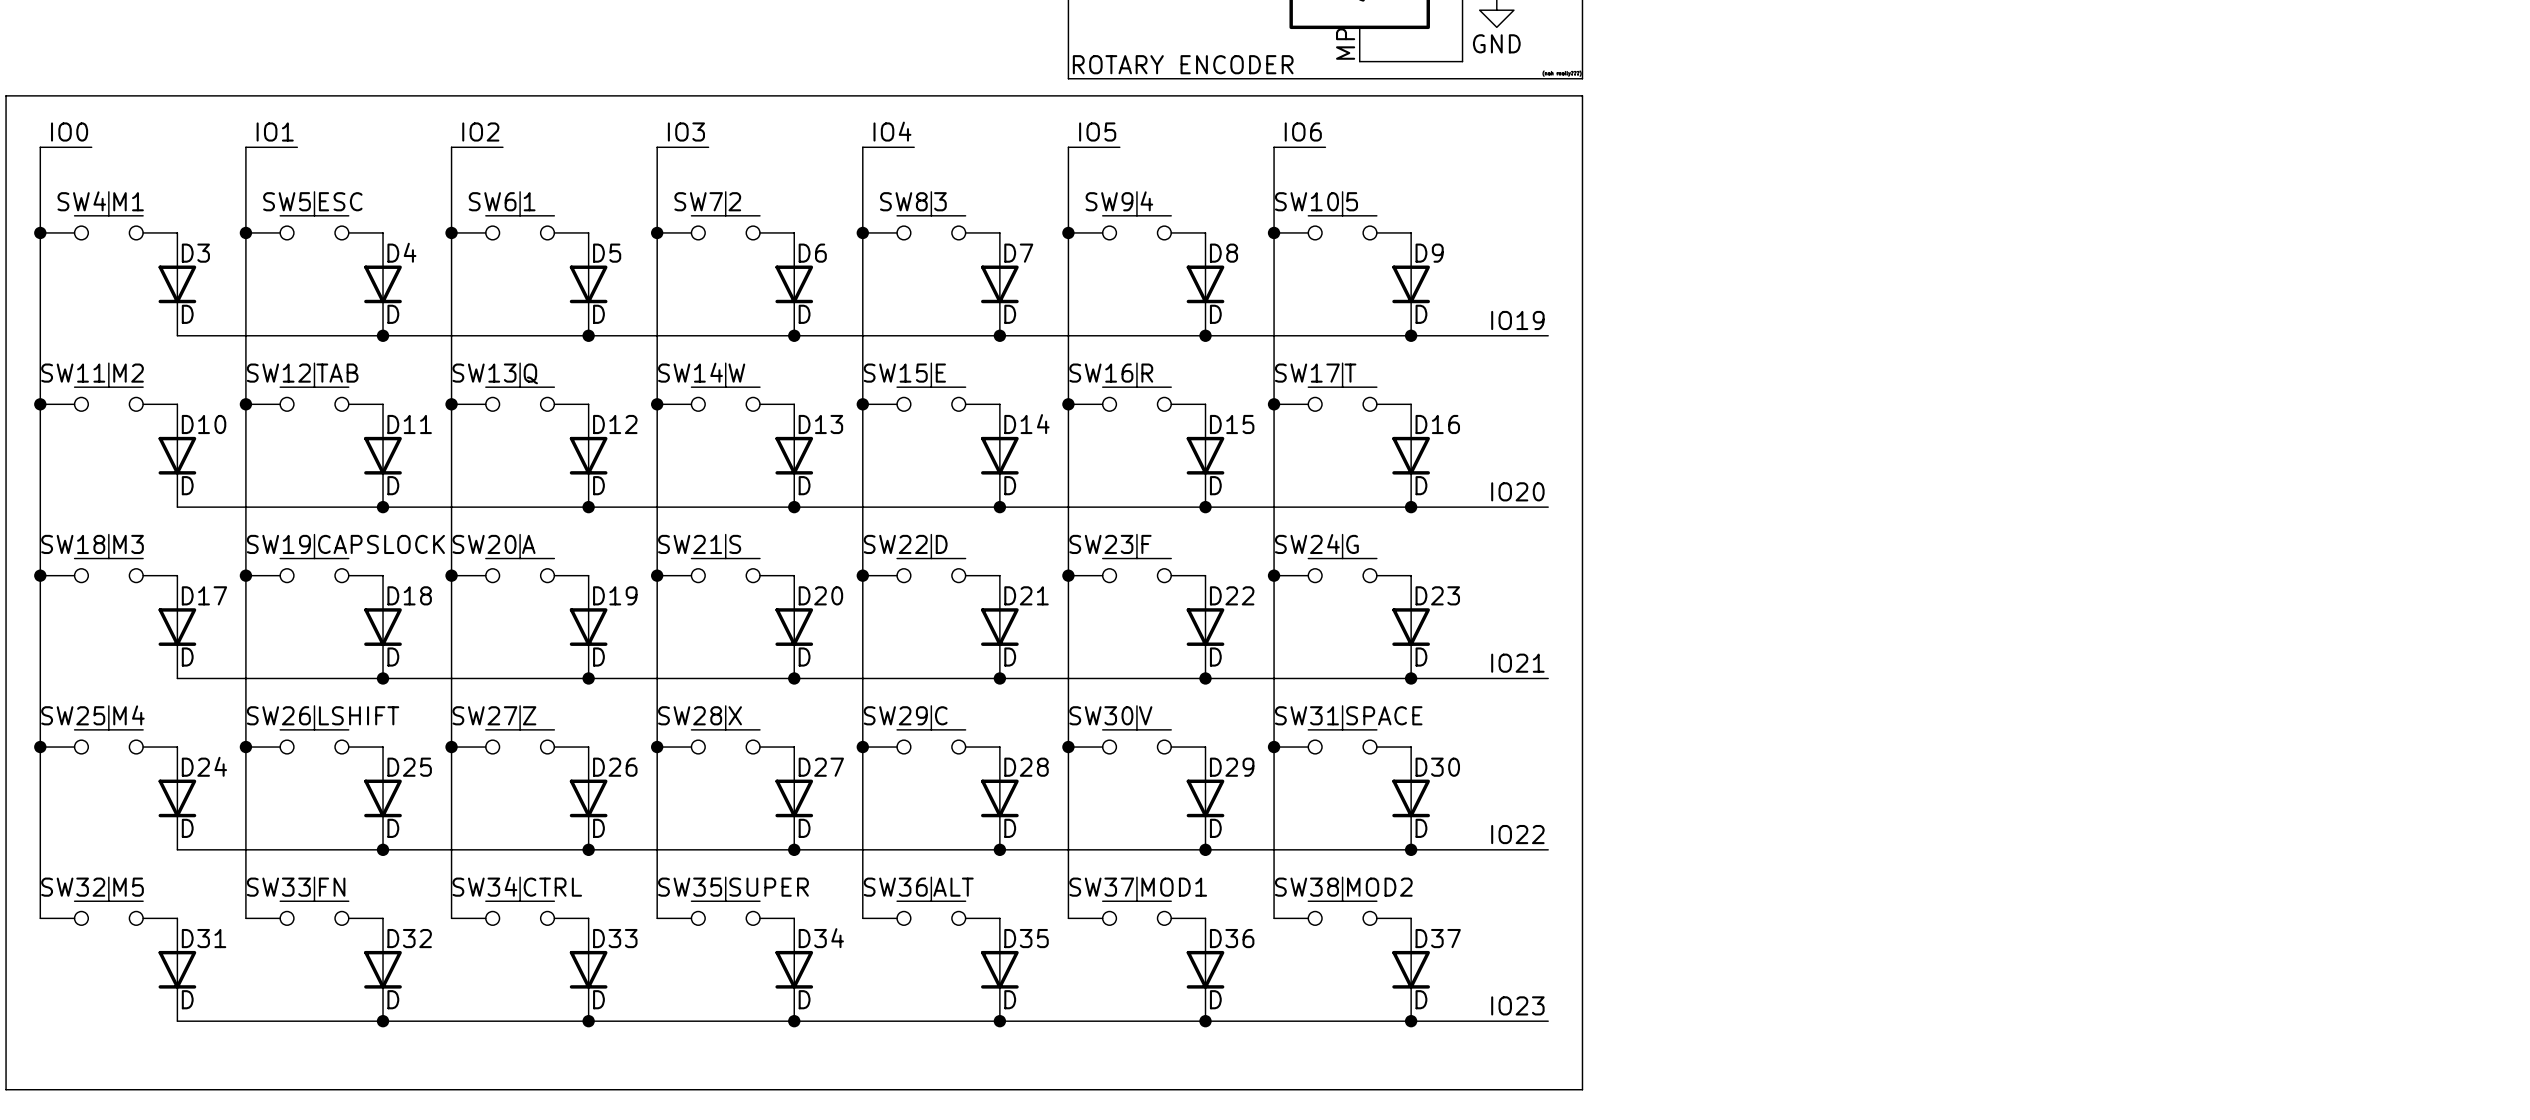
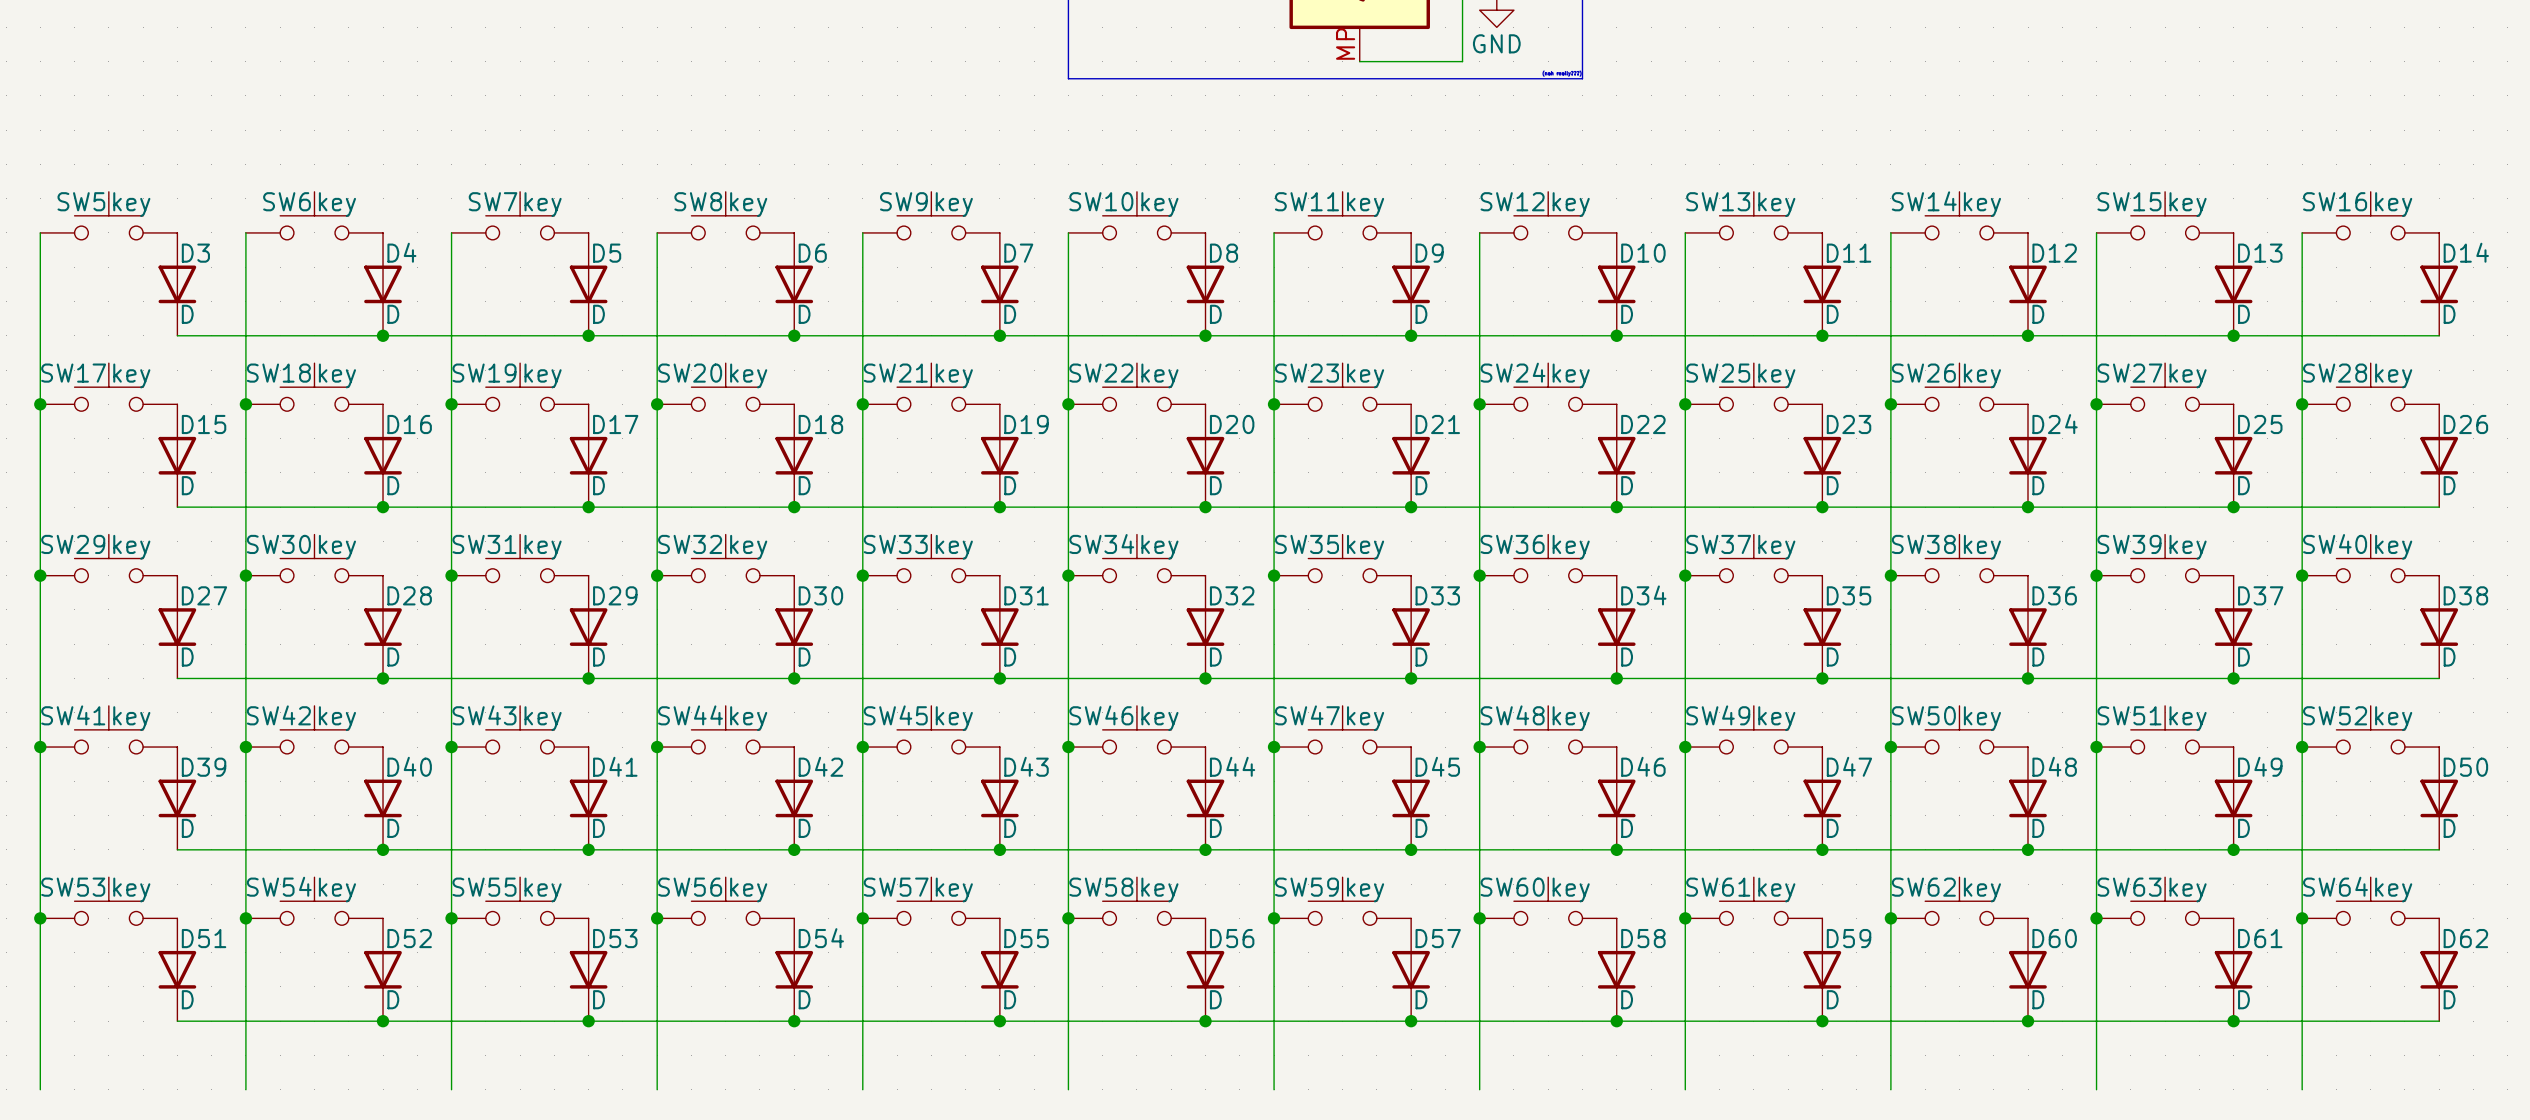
text: ROTARY ENCODER (1183, 64) -> none
line: (6, 95) (1582, 95) (1582, 1089) (6, 1089) (6, 95) -> none
label: IO0 (69, 131) -> none
label: IO1 (275, 131) -> none
label: IO2 (480, 131) -> none
label: IO3 (686, 131) -> none
label: IO4 (892, 131) -> none
label: IO5 (1097, 131) -> none
label: IO6 (1303, 131) -> none
wire: (91, 147) (40, 147) (40, 232) -> none
wire: (297, 147) (245, 147) (245, 232) -> none
wire: (502, 147) (451, 147) (451, 232) -> none
wire: (708, 147) (657, 147) (657, 232) -> none
wire: (914, 147) (862, 147) (862, 232) -> none
wire: (1119, 147) (1068, 147) (1068, 232) -> none
wire: (1325, 147) (1274, 147) (1274, 232) -> none
SW4 name: SW4 (81, 201) -> SW5 (81, 201)
SW4 value: M1 (128, 201) -> key (131, 204)
SW5 name: SW5 (287, 201) -> SW6 (287, 201)
SW5 value: ESC (340, 201) -> key (337, 204)
SW6 name: SW6 (492, 201) -> SW7 (493, 201)
SW6 value: 1 (529, 201) -> key (543, 204)
SW7 name: SW7 (698, 201) -> SW8 (698, 201)
SW7 value: 2 (734, 201) -> key (748, 204)
SW8 name: SW8 (903, 201) -> SW9 (903, 201)
SW8 value: 3 (940, 201) -> key (954, 204)
SW9 name: SW9 (1109, 201) -> SW10 (1101, 201)
SW9 value: 4 (1146, 201) -> key (1159, 204)
SW10 name: SW10 (1306, 201) -> SW11 (1306, 201)
SW10 value: 5 (1352, 201) -> key (1365, 204)
SW12: none -> key (1548, 215)
SW13: none -> key (1753, 215)
SW14: none -> key (1959, 215)
SW15: none -> key (2165, 215)
SW16: none -> key (2370, 215)
junction: (40, 232) -> none
junction: (245, 232) -> none
junction: (451, 232) -> none
junction: (657, 232) -> none
junction: (862, 232) -> none
junction: (1068, 232) -> none
junction: (1274, 232) -> none
wire: none -> (1479, 232) (1479, 1089)
wire: none -> (1685, 232) (1685, 1089)
wire: none -> (1890, 232) (1890, 1089)
wire: none -> (2096, 232) (2096, 1089)
wire: none -> (2302, 232) (2302, 1089)
D10: none -> D (1616, 284)
D11: none -> D (1822, 284)
D12: none -> D (2028, 284)
D13: none -> D (2233, 284)
D14: none -> D (2439, 284)
label: IO19 (1517, 320) -> none
wire: none -> (1548, 335) (2439, 335)
junction: none -> (1616, 335)
junction: none -> (1822, 335)
junction: none -> (2028, 335)
junction: none -> (2233, 335)
SW14 name: SW14 (690, 372) -> SW20 (690, 373)
SW11 name: SW11 (73, 373) -> SW17 (73, 373)
SW11 value: M2 (128, 373) -> key (131, 375)
SW12 name: SW12 (278, 373) -> SW18 (278, 373)
SW12 value: TAB (337, 373) -> key (337, 375)
SW13 name: SW13 (484, 373) -> SW19 (484, 373)
SW13 value: Q (530, 373) -> key (543, 375)
SW14 value: W (736, 373) -> key (748, 375)
SW15 name: SW15 (895, 373) -> SW21 (895, 373)
SW15 value: E (940, 373) -> key (954, 375)
SW16 name: SW16 (1101, 373) -> SW22 (1101, 373)
SW16 value: R (1147, 373) -> key (1159, 375)
SW17 name: SW17 (1307, 373) -> SW23 (1306, 373)
SW17 value: T (1350, 373) -> key (1365, 375)
SW24: none -> key (1548, 387)
SW25: none -> key (1753, 387)
SW26: none -> key (1959, 387)
SW27: none -> key (2165, 387)
SW28: none -> key (2370, 387)
junction: none -> (1479, 404)
junction: none -> (1685, 404)
junction: none -> (1890, 404)
junction: none -> (2096, 404)
junction: none -> (2302, 404)
D10 name: D10 (204, 424) -> D15 (204, 424)
D11 name: D11 (409, 424) -> D16 (409, 424)
D12 name: D12 (615, 424) -> D17 (615, 424)
D13 name: D13 (820, 424) -> D18 (820, 424)
D14 name: D14 (1026, 424) -> D19 (1026, 424)
D15 name: D15 (1232, 424) -> D20 (1232, 424)
D16 name: D16 (1437, 424) -> D21 (1437, 424)
D22: none -> D (1616, 455)
D23: none -> D (1822, 455)
D24: none -> D (2028, 455)
D25: none -> D (2233, 455)
D26: none -> D (2439, 455)
label: IO20 (1517, 491) -> none
wire: none -> (1548, 507) (2439, 507)
junction: none -> (1616, 507)
junction: none -> (1822, 507)
junction: none -> (2028, 507)
junction: none -> (2233, 507)
SW18 name: SW18 (73, 544) -> SW29 (73, 544)
SW18 value: M3 (128, 544) -> key (131, 547)
SW19 name: SW19 (278, 544) -> SW30 (278, 544)
SW19 value: CAPSLOCK (381, 544) -> key (337, 547)
SW20 name: SW20 (484, 544) -> SW31 (484, 544)
SW20 value: A (528, 544) -> key (543, 547)
SW21 name: SW21 (690, 544) -> SW32 (690, 544)
SW21 value: S (735, 544) -> key (748, 547)
SW22 name: SW22 (895, 544) -> SW33 (895, 544)
SW22 value: D (941, 544) -> key (954, 547)
SW23 name: SW23 (1101, 544) -> SW34 (1101, 544)
SW23 value: F (1146, 544) -> key (1159, 547)
SW24 name: SW24 (1307, 544) -> SW35 (1306, 544)
SW24 value: G (1352, 544) -> key (1365, 547)
SW36: none -> key (1548, 558)
SW37: none -> key (1753, 558)
SW38: none -> key (1959, 558)
SW39: none -> key (2165, 558)
SW40: none -> key (2370, 558)
junction: none -> (1479, 575)
junction: none -> (1685, 575)
junction: none -> (1890, 575)
junction: none -> (2096, 575)
junction: none -> (2302, 575)
D17 name: D17 (204, 595) -> D27 (204, 595)
D18 name: D18 (409, 595) -> D28 (409, 595)
D19 name: D19 (615, 595) -> D29 (615, 595)
D20 name: D20 (820, 595) -> D30 (820, 595)
D21 name: D21 (1026, 595) -> D31 (1026, 595)
D22 name: D22 (1232, 595) -> D32 (1232, 595)
D23 name: D23 (1437, 595) -> D33 (1437, 595)
D34: none -> D (1616, 627)
D35: none -> D (1822, 627)
D36: none -> D (2028, 627)
D37: none -> D (2233, 627)
D38: none -> D (2439, 627)
label: IO21 (1517, 663) -> none
wire: none -> (1548, 678) (2439, 678)
junction: none -> (1616, 678)
junction: none -> (1822, 678)
junction: none -> (2028, 678)
junction: none -> (2233, 678)
SW25 name: SW25 (73, 715) -> SW41 (73, 715)
SW25 value: M4 (128, 715) -> key (131, 718)
SW26 name: SW26 (278, 715) -> SW42 (278, 715)
SW26 value: LSHIFT (359, 715) -> key (337, 718)
SW27 name: SW27 (484, 715) -> SW43 (484, 715)
SW27 value: Z (529, 715) -> key (543, 718)
SW28 name: SW28 (690, 715) -> SW44 (690, 715)
SW28 value: X (735, 715) -> key (748, 718)
SW29 name: SW29 (895, 715) -> SW45 (895, 715)
SW29 value: C (941, 715) -> key (954, 718)
SW30 name: SW30 (1101, 715) -> SW46 (1101, 715)
SW30 value: V (1145, 715) -> key (1159, 718)
SW31 name: SW31 (1306, 715) -> SW47 (1307, 715)
SW31 value: SPACE (1384, 715) -> key (1365, 718)
SW48: none -> key (1548, 729)
SW49: none -> key (1753, 729)
SW50: none -> key (1959, 729)
SW51: none -> key (2165, 729)
SW52: none -> key (2370, 729)
junction: none -> (1479, 747)
junction: none -> (1685, 747)
junction: none -> (1890, 747)
junction: none -> (2096, 747)
junction: none -> (2302, 747)
D24 name: D24 (204, 766) -> D39 (204, 767)
D25 name: D25 (409, 767) -> D40 (409, 766)
D26 name: D26 (615, 767) -> D41 (615, 766)
D27 name: D27 (821, 767) -> D42 (820, 766)
D28 name: D28 (1026, 767) -> D43 (1026, 766)
D29 name: D29 (1232, 767) -> D44 (1232, 766)
D30 name: D30 (1437, 767) -> D45 (1437, 766)
D46: none -> D (1616, 798)
D47: none -> D (1822, 798)
D48: none -> D (2028, 798)
D49: none -> D (2233, 798)
D50: none -> D (2439, 798)
label: IO22 (1517, 834) -> none
wire: none -> (1548, 849) (2439, 849)
junction: none -> (1616, 849)
junction: none -> (1822, 849)
junction: none -> (2028, 849)
junction: none -> (2233, 849)
SW34 name: SW34 (484, 886) -> SW55 (484, 887)
SW32 name: SW32 (73, 887) -> SW53 (73, 887)
SW32 value: M5 (128, 887) -> key (131, 890)
SW33 name: SW33 (278, 887) -> SW54 (279, 886)
SW33 value: FN (332, 887) -> key (337, 890)
SW34 value: CTRL (552, 887) -> key (543, 890)
SW35 name: SW35 (690, 887) -> SW56 (690, 887)
SW35 value: SUPER (769, 887) -> key (748, 890)
SW36 name: SW36 (895, 887) -> SW57 (896, 887)
SW36 value: ALT (953, 887) -> key (954, 890)
SW37 name: SW37 (1101, 887) -> SW58 (1101, 887)
SW37 value: MOD1 (1174, 887) -> key (1159, 890)
SW38 name: SW38 (1306, 887) -> SW59 (1306, 887)
SW38 value: MOD2 (1379, 887) -> key (1365, 890)
SW60: none -> key (1548, 901)
SW61: none -> key (1753, 901)
SW62: none -> key (1959, 901)
SW63: none -> key (2165, 901)
SW64: none -> key (2370, 901)
wire: none -> (40, 918) (40, 1089)
junction: none -> (40, 918)
wire: none -> (245, 918) (245, 1089)
junction: none -> (245, 918)
wire: none -> (451, 918) (451, 1089)
junction: none -> (451, 918)
wire: none -> (657, 918) (657, 1089)
junction: none -> (657, 918)
wire: none -> (862, 918) (862, 1089)
junction: none -> (862, 918)
wire: none -> (1068, 918) (1068, 1089)
junction: none -> (1068, 918)
wire: none -> (1274, 918) (1274, 1089)
junction: none -> (1274, 918)
junction: none -> (1479, 918)
junction: none -> (1685, 918)
junction: none -> (1890, 918)
junction: none -> (2096, 918)
junction: none -> (2302, 918)
D31 name: D31 (204, 938) -> D51 (204, 938)
D32 name: D32 (409, 938) -> D52 (409, 938)
D33 name: D33 (615, 938) -> D53 (615, 938)
D34 name: D34 (821, 938) -> D54 (821, 938)
D35 name: D35 (1026, 938) -> D55 (1026, 938)
D36 name: D36 (1232, 938) -> D56 (1232, 938)
D37 name: D37 (1438, 938) -> D57 (1438, 938)
D58: none -> D (1616, 969)
D59: none -> D (1822, 969)
D60: none -> D (2028, 969)
D61: none -> D (2233, 969)
D62: none -> D (2439, 969)
label: IO23 (1517, 1005) -> none
wire: none -> (1548, 1021) (2439, 1021)
junction: none -> (1616, 1021)
junction: none -> (1822, 1021)
junction: none -> (2028, 1021)
junction: none -> (2233, 1021)

